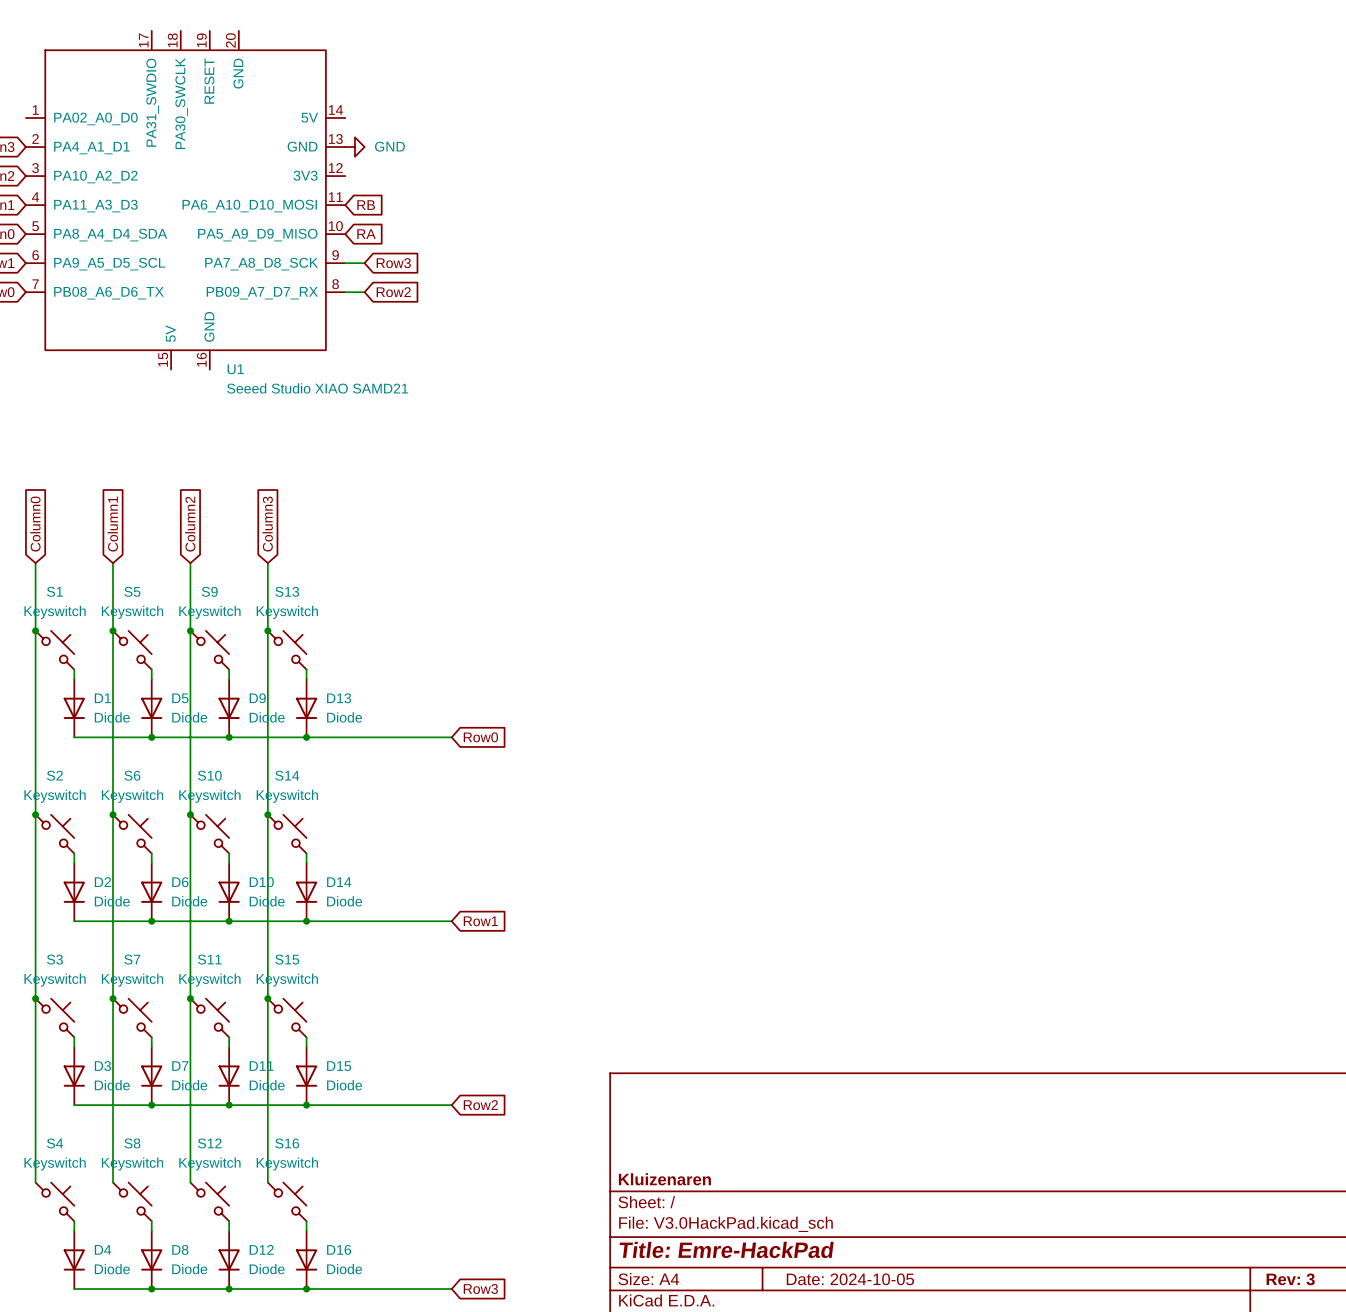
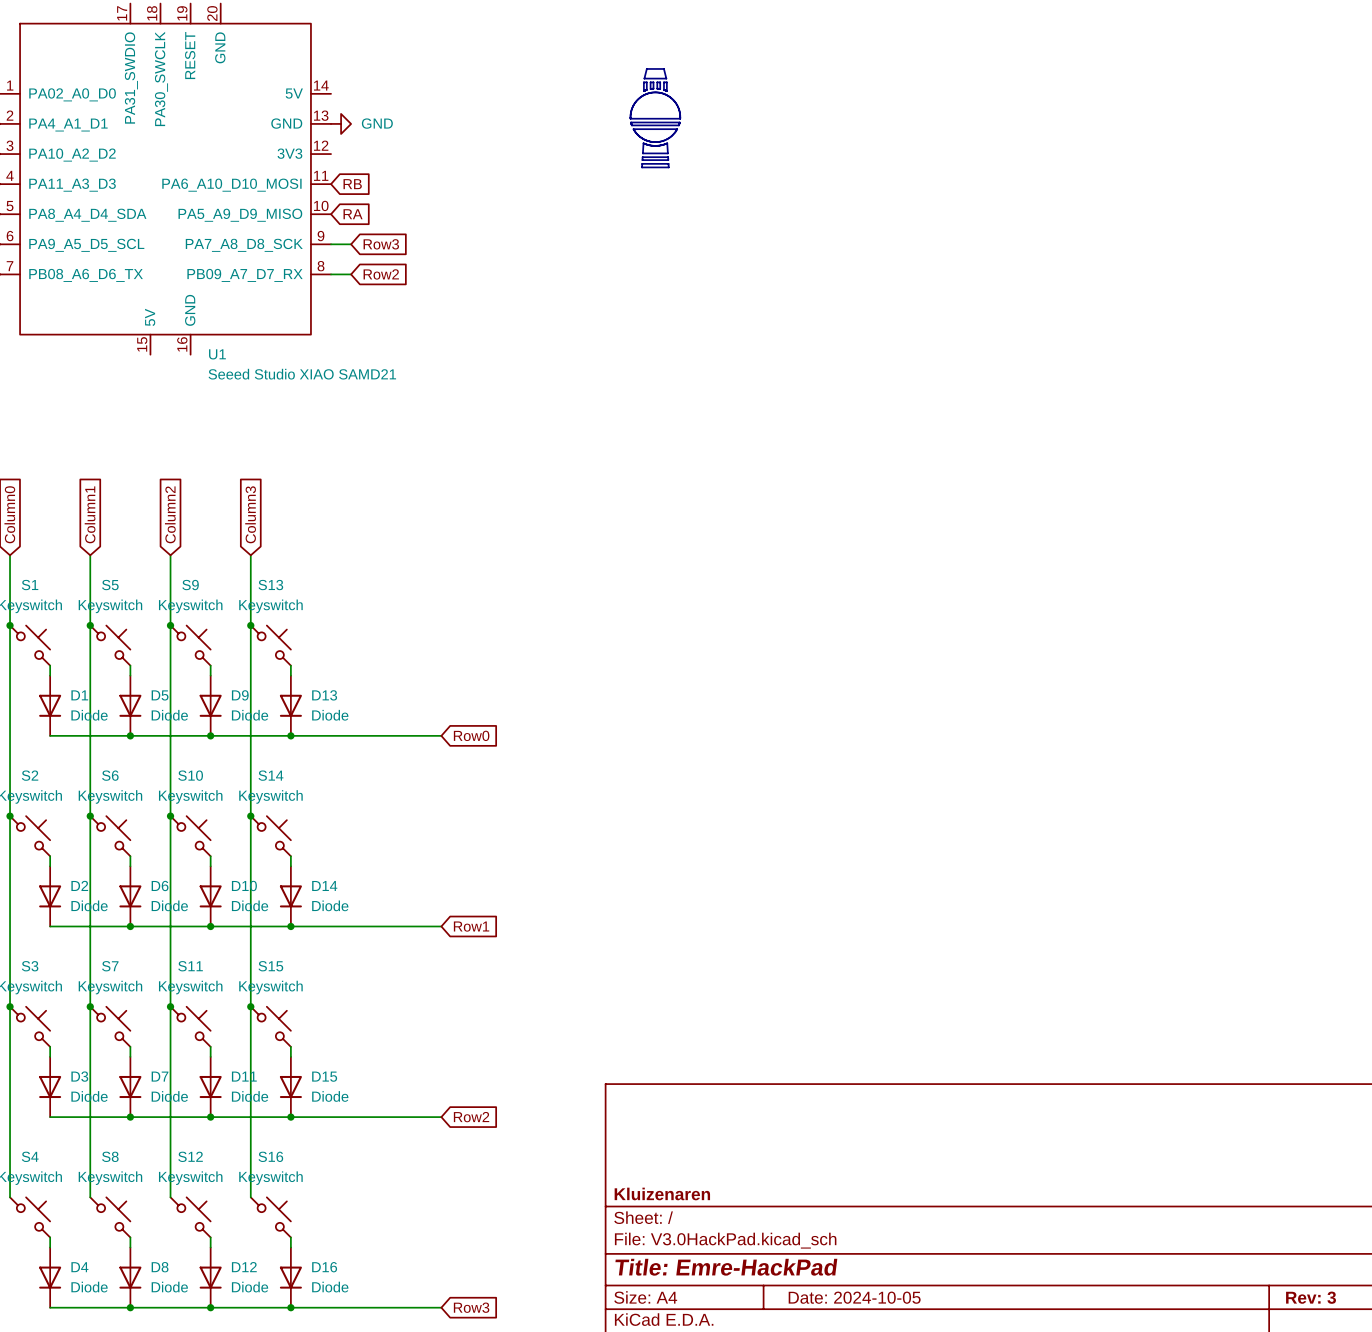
line: none -> (646, 68) (644, 78) (666, 78) (663, 68) (646, 68)
line: none -> (643, 82) (646, 82) (646, 89) (643, 91) (643, 82)
line: none -> (650, 82) (653, 82) (653, 88) (650, 89) (650, 82)
line: none -> (657, 82) (657, 88) (660, 89) (660, 82) (657, 82)
line: none -> (663, 82) (666, 82) (666, 91) (663, 89) (663, 82)
line: none -> (655, 92) (645, 94) (636, 100) (632, 108) (630, 118) (680, 118) (678, 108) (673, 100) (665, 94) (655, 92)
line: none -> (631, 122) (631, 125) (678, 125) (679, 122) (631, 122)
line: none -> (633, 129) (642, 138) (655, 142) (668, 138) (677, 129) (633, 129)
line: none -> (643, 143) (642, 153) (667, 153) (667, 143) (655, 145) (643, 143)
line: none -> (642, 157) (642, 160) (668, 160) (668, 157) (642, 157)
line: none -> (642, 163) (642, 167) (668, 167) (668, 163) (642, 163)

